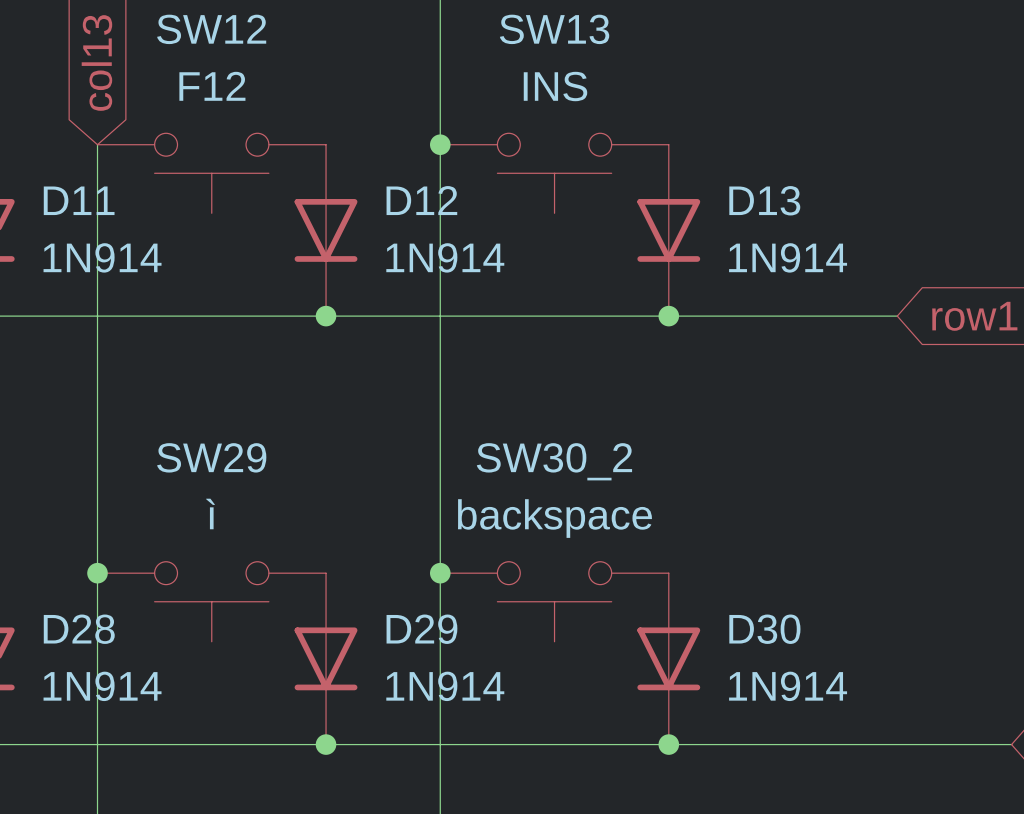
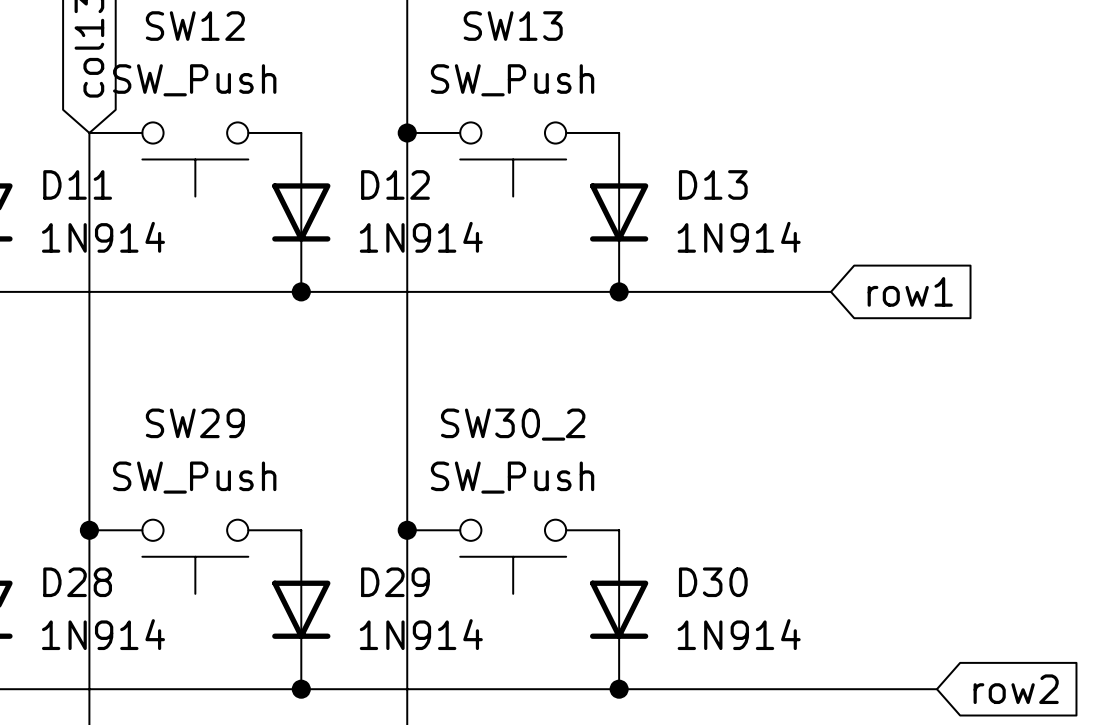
SW12 value: F12 (212, 86) -> SW_Push (194, 80)
SW13 value: INS (555, 86) -> SW_Push (512, 80)
SW29 value: ì (210, 513) -> SW_Push (194, 477)
SW30_2 value: backspace (554, 518) -> SW_Push (512, 477)

